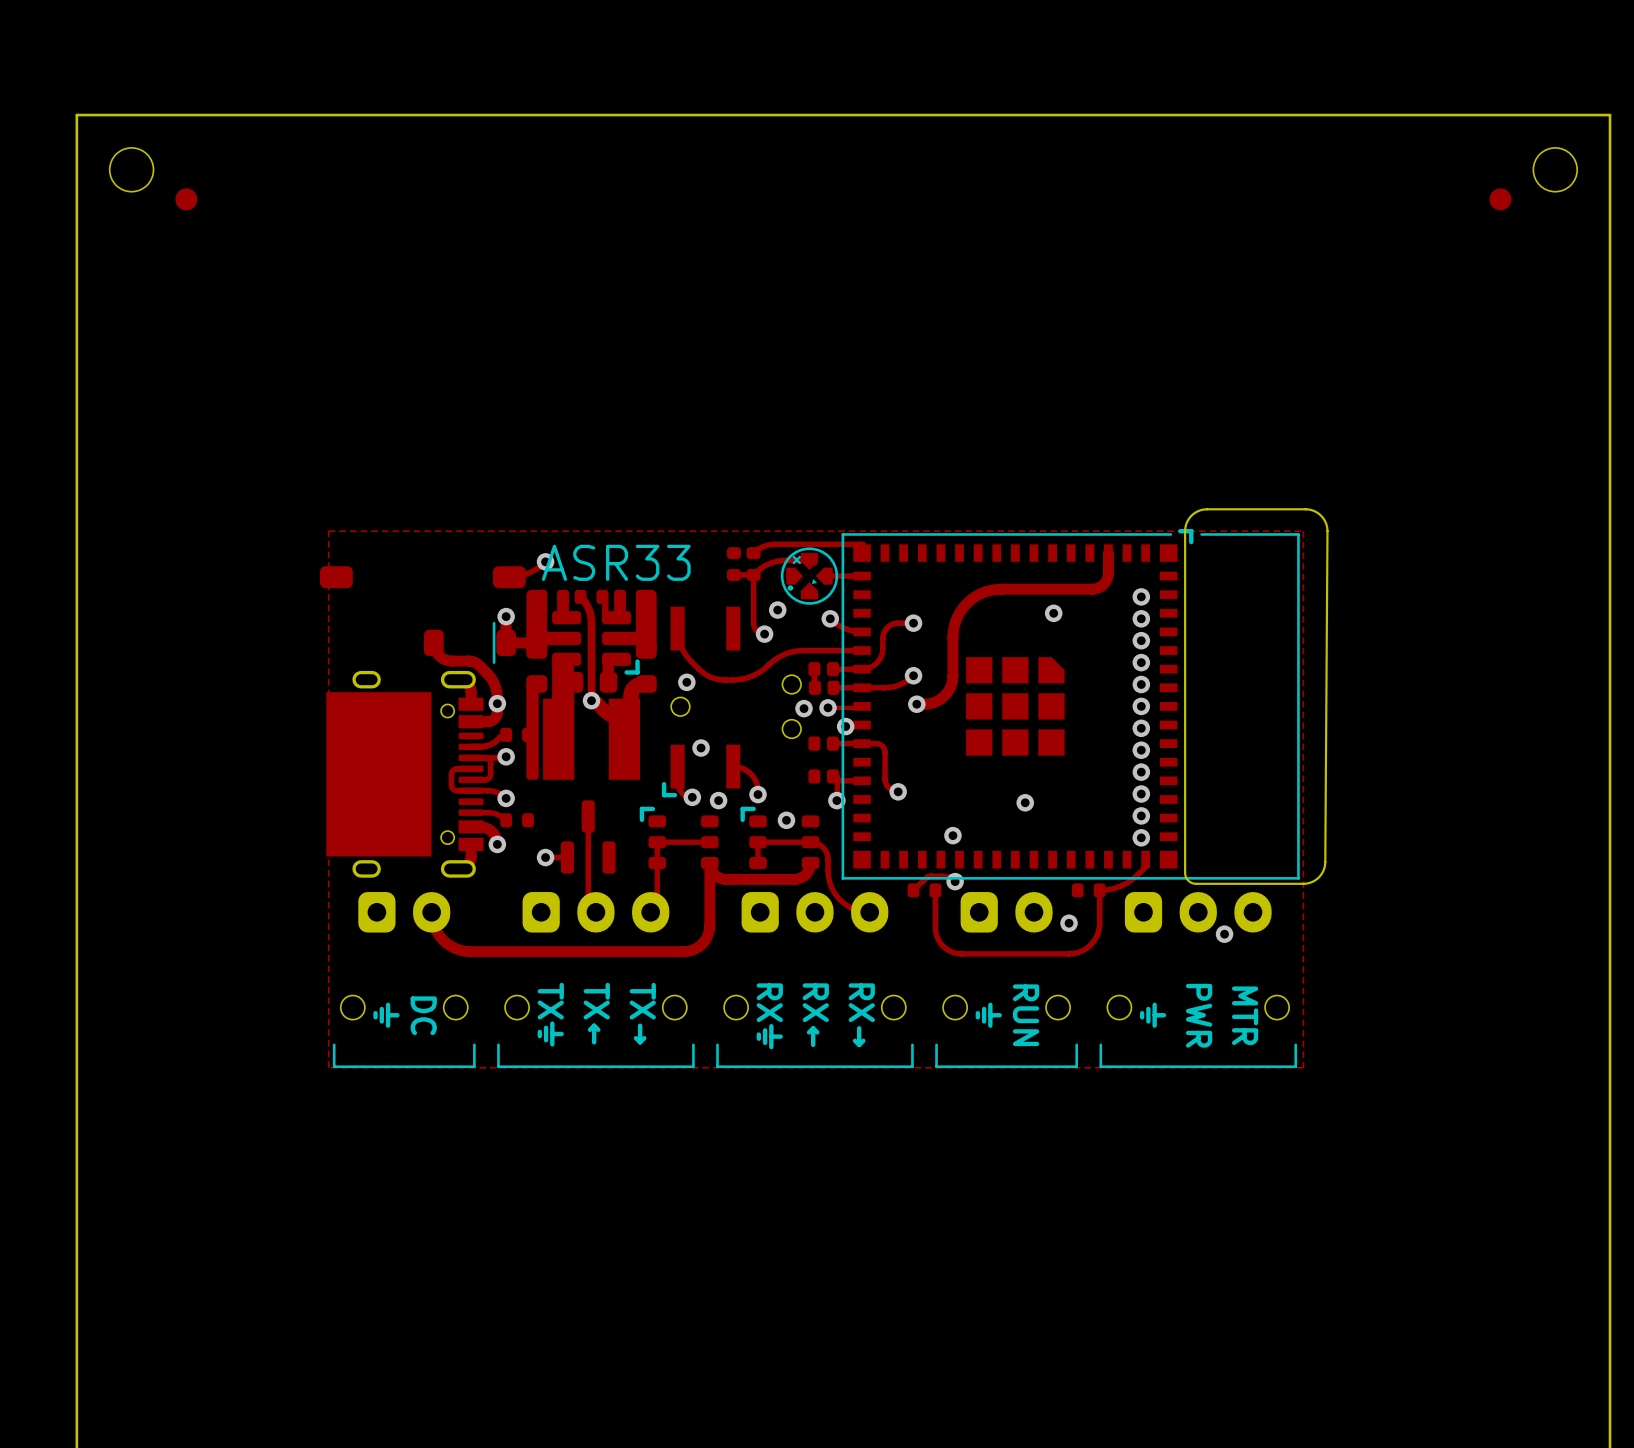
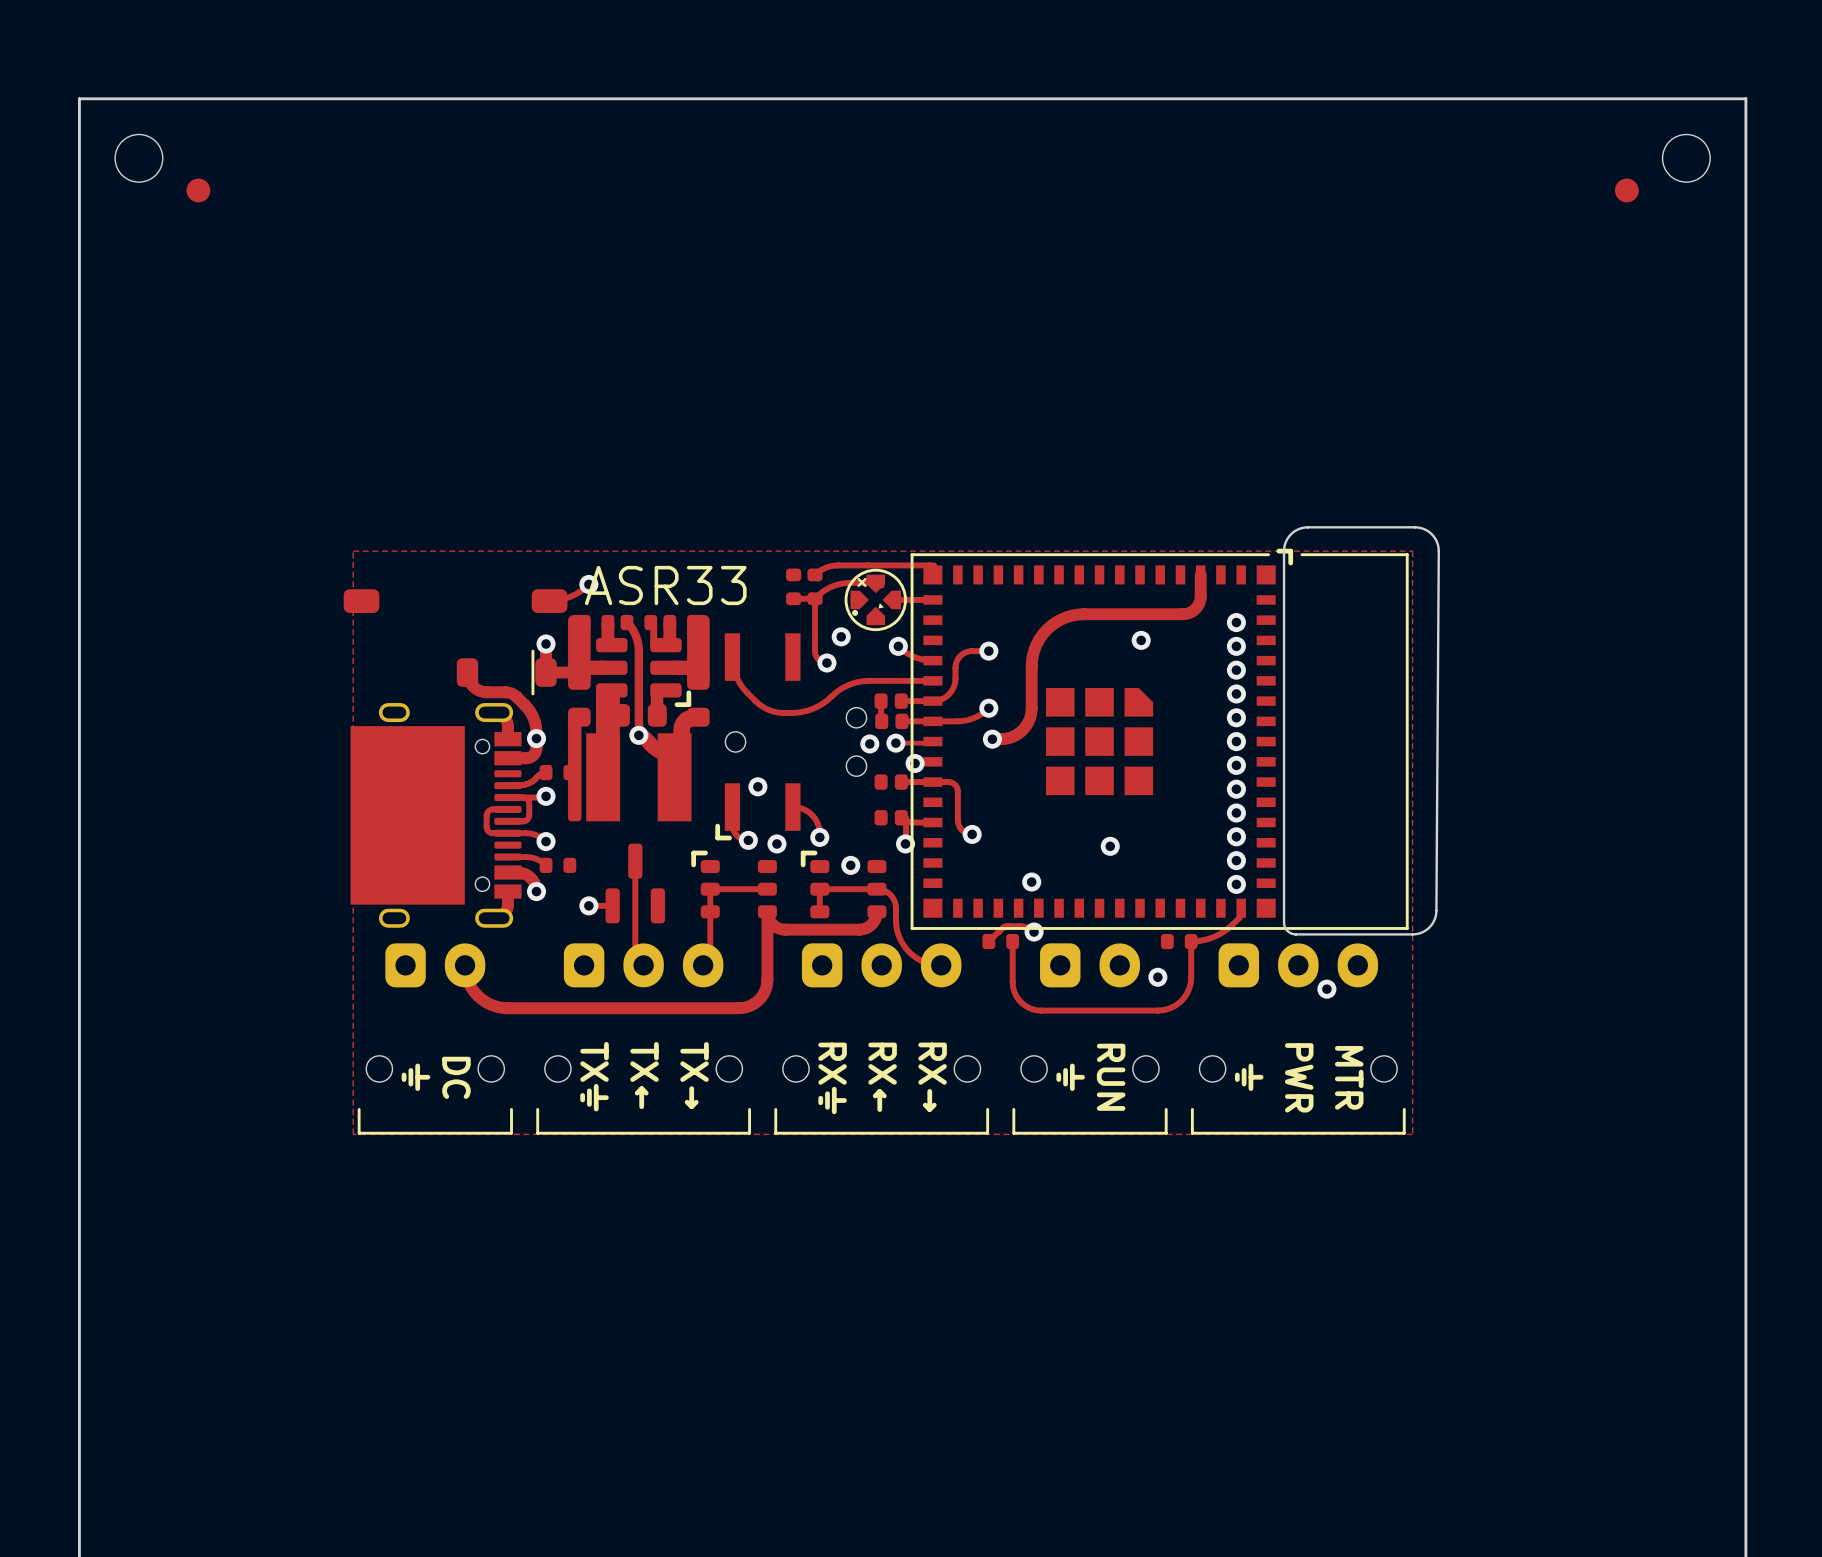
via: (686, 682) -> none

